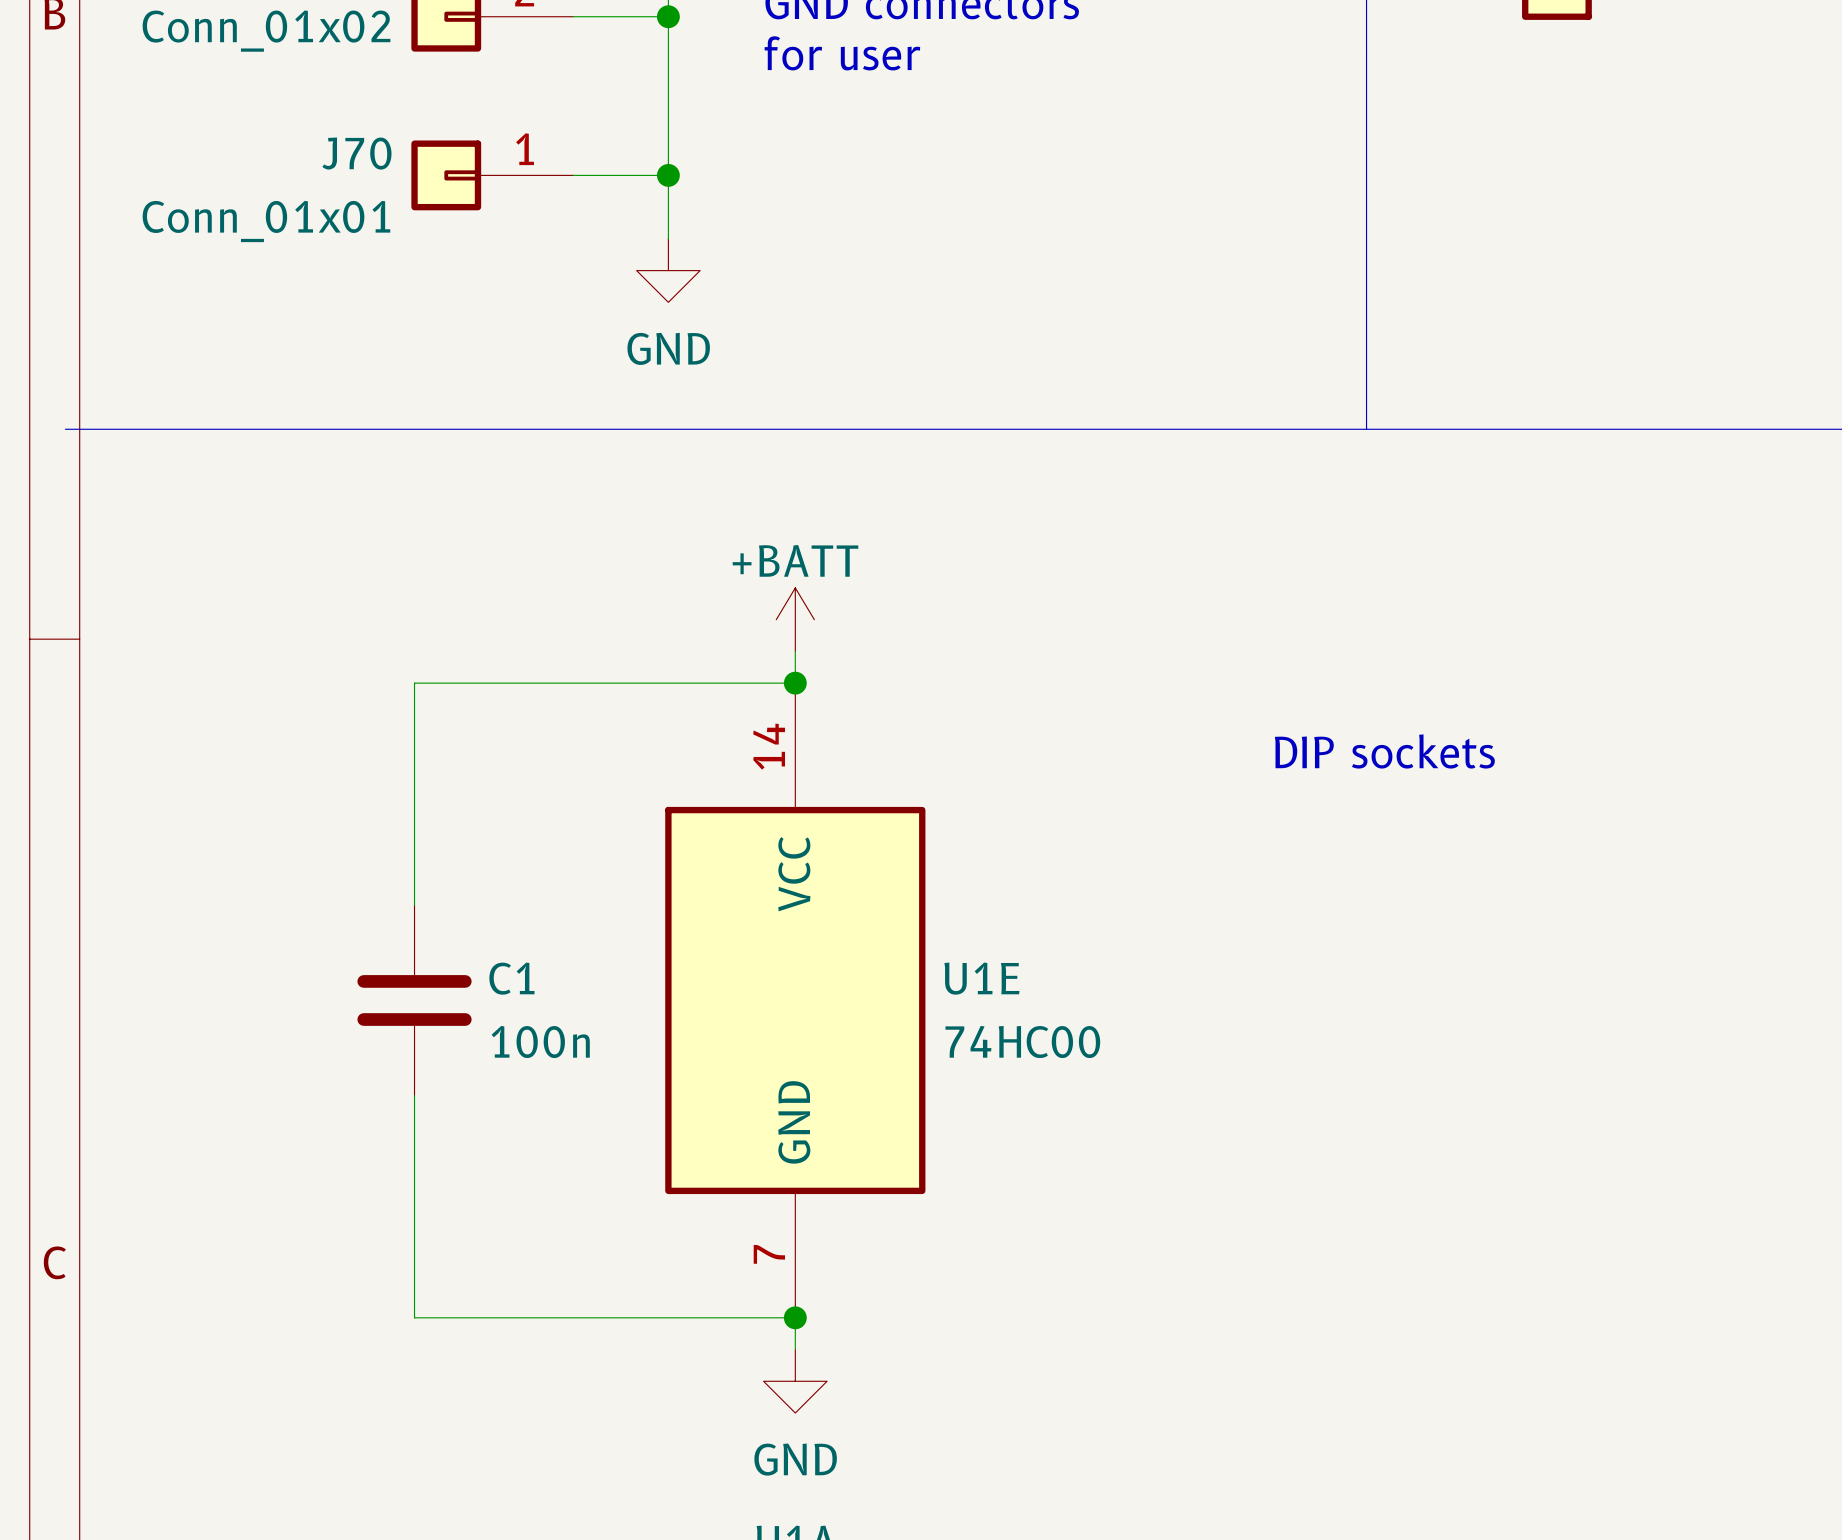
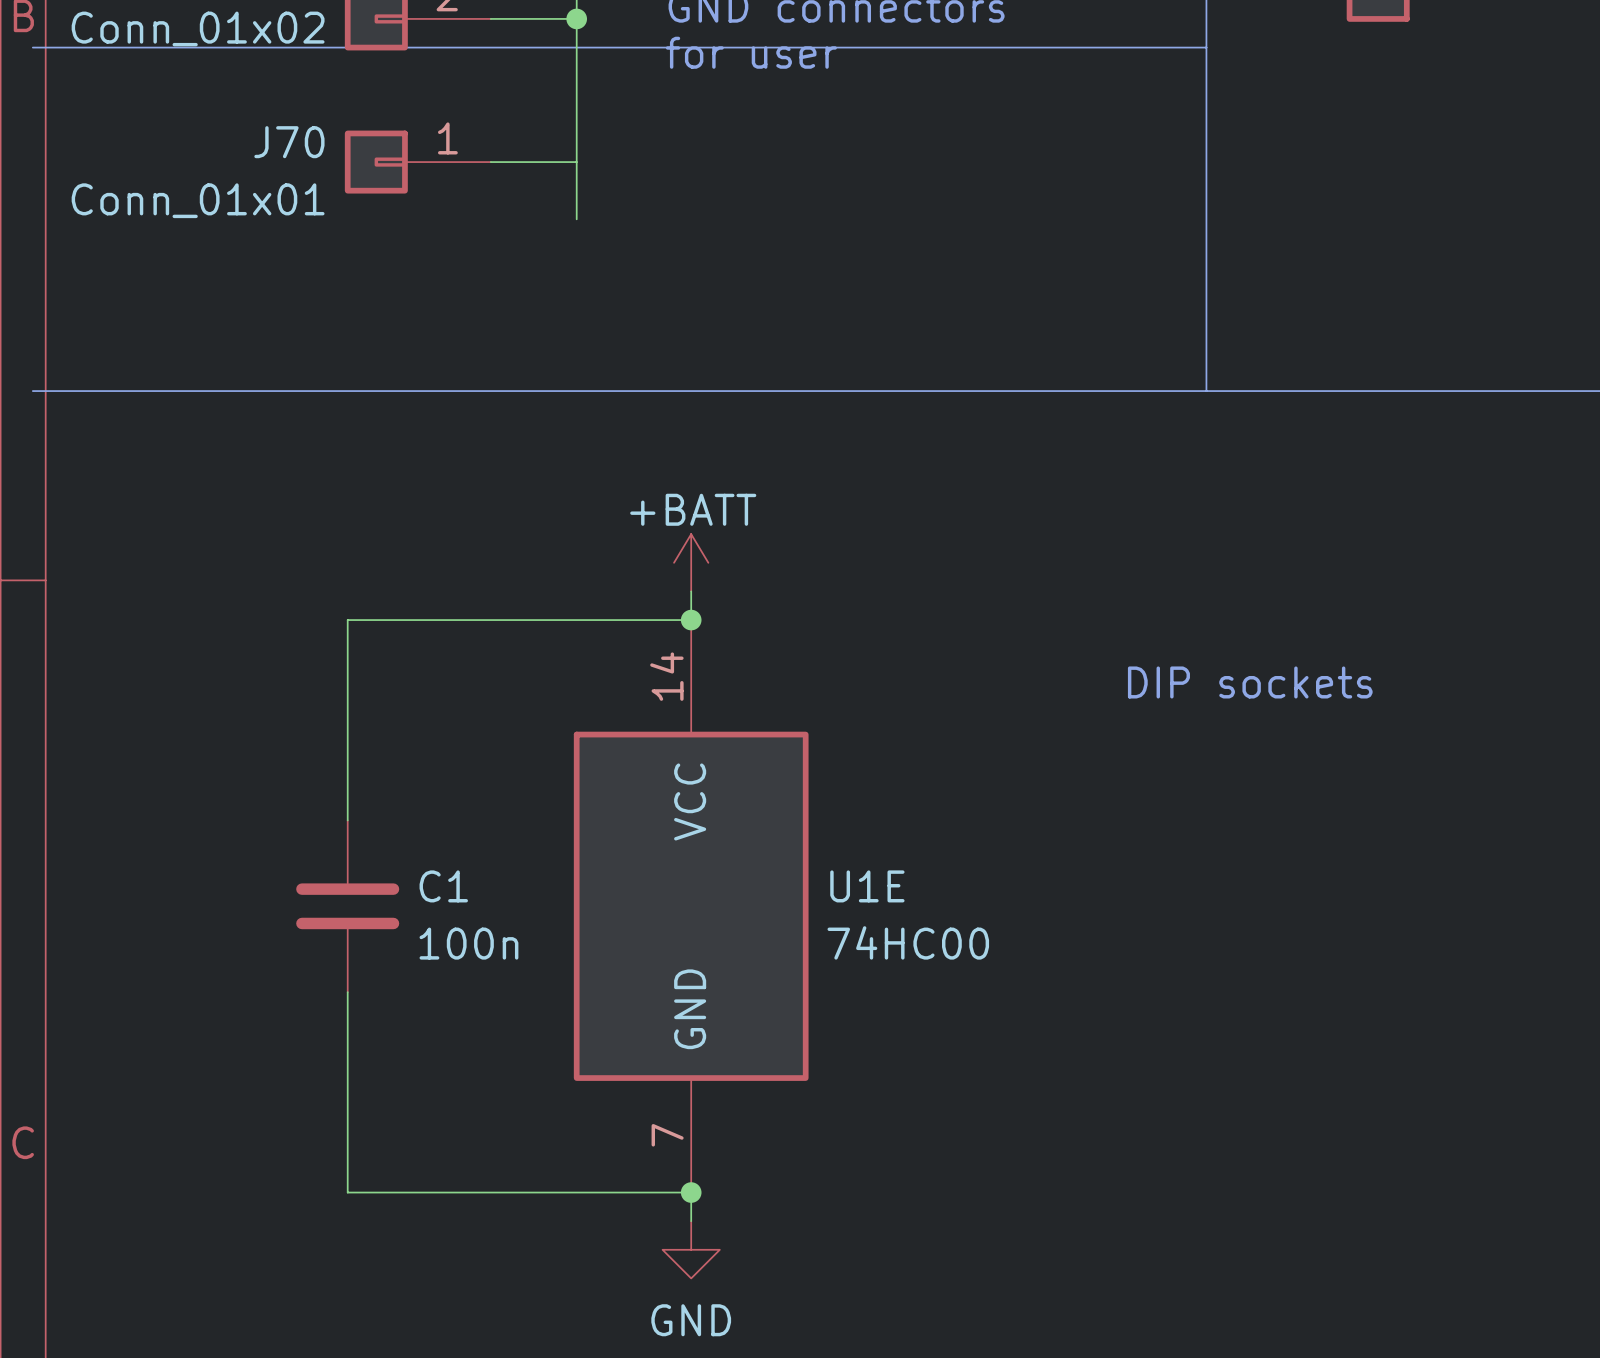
line: none -> (32, 47) (1206, 47)
junction: (668, 175) -> none
power symbol: GND (668, 270) -> none

